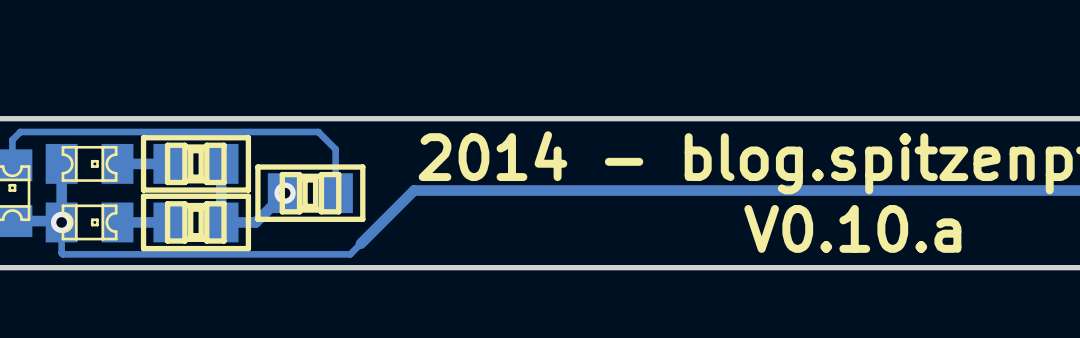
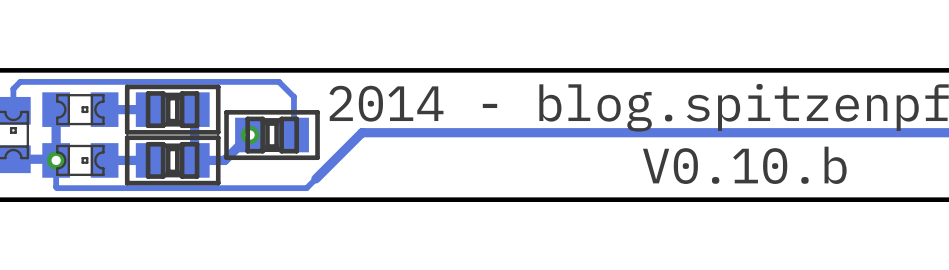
text: V0.10.a (852, 228) -> V0.10.b (744, 165)

